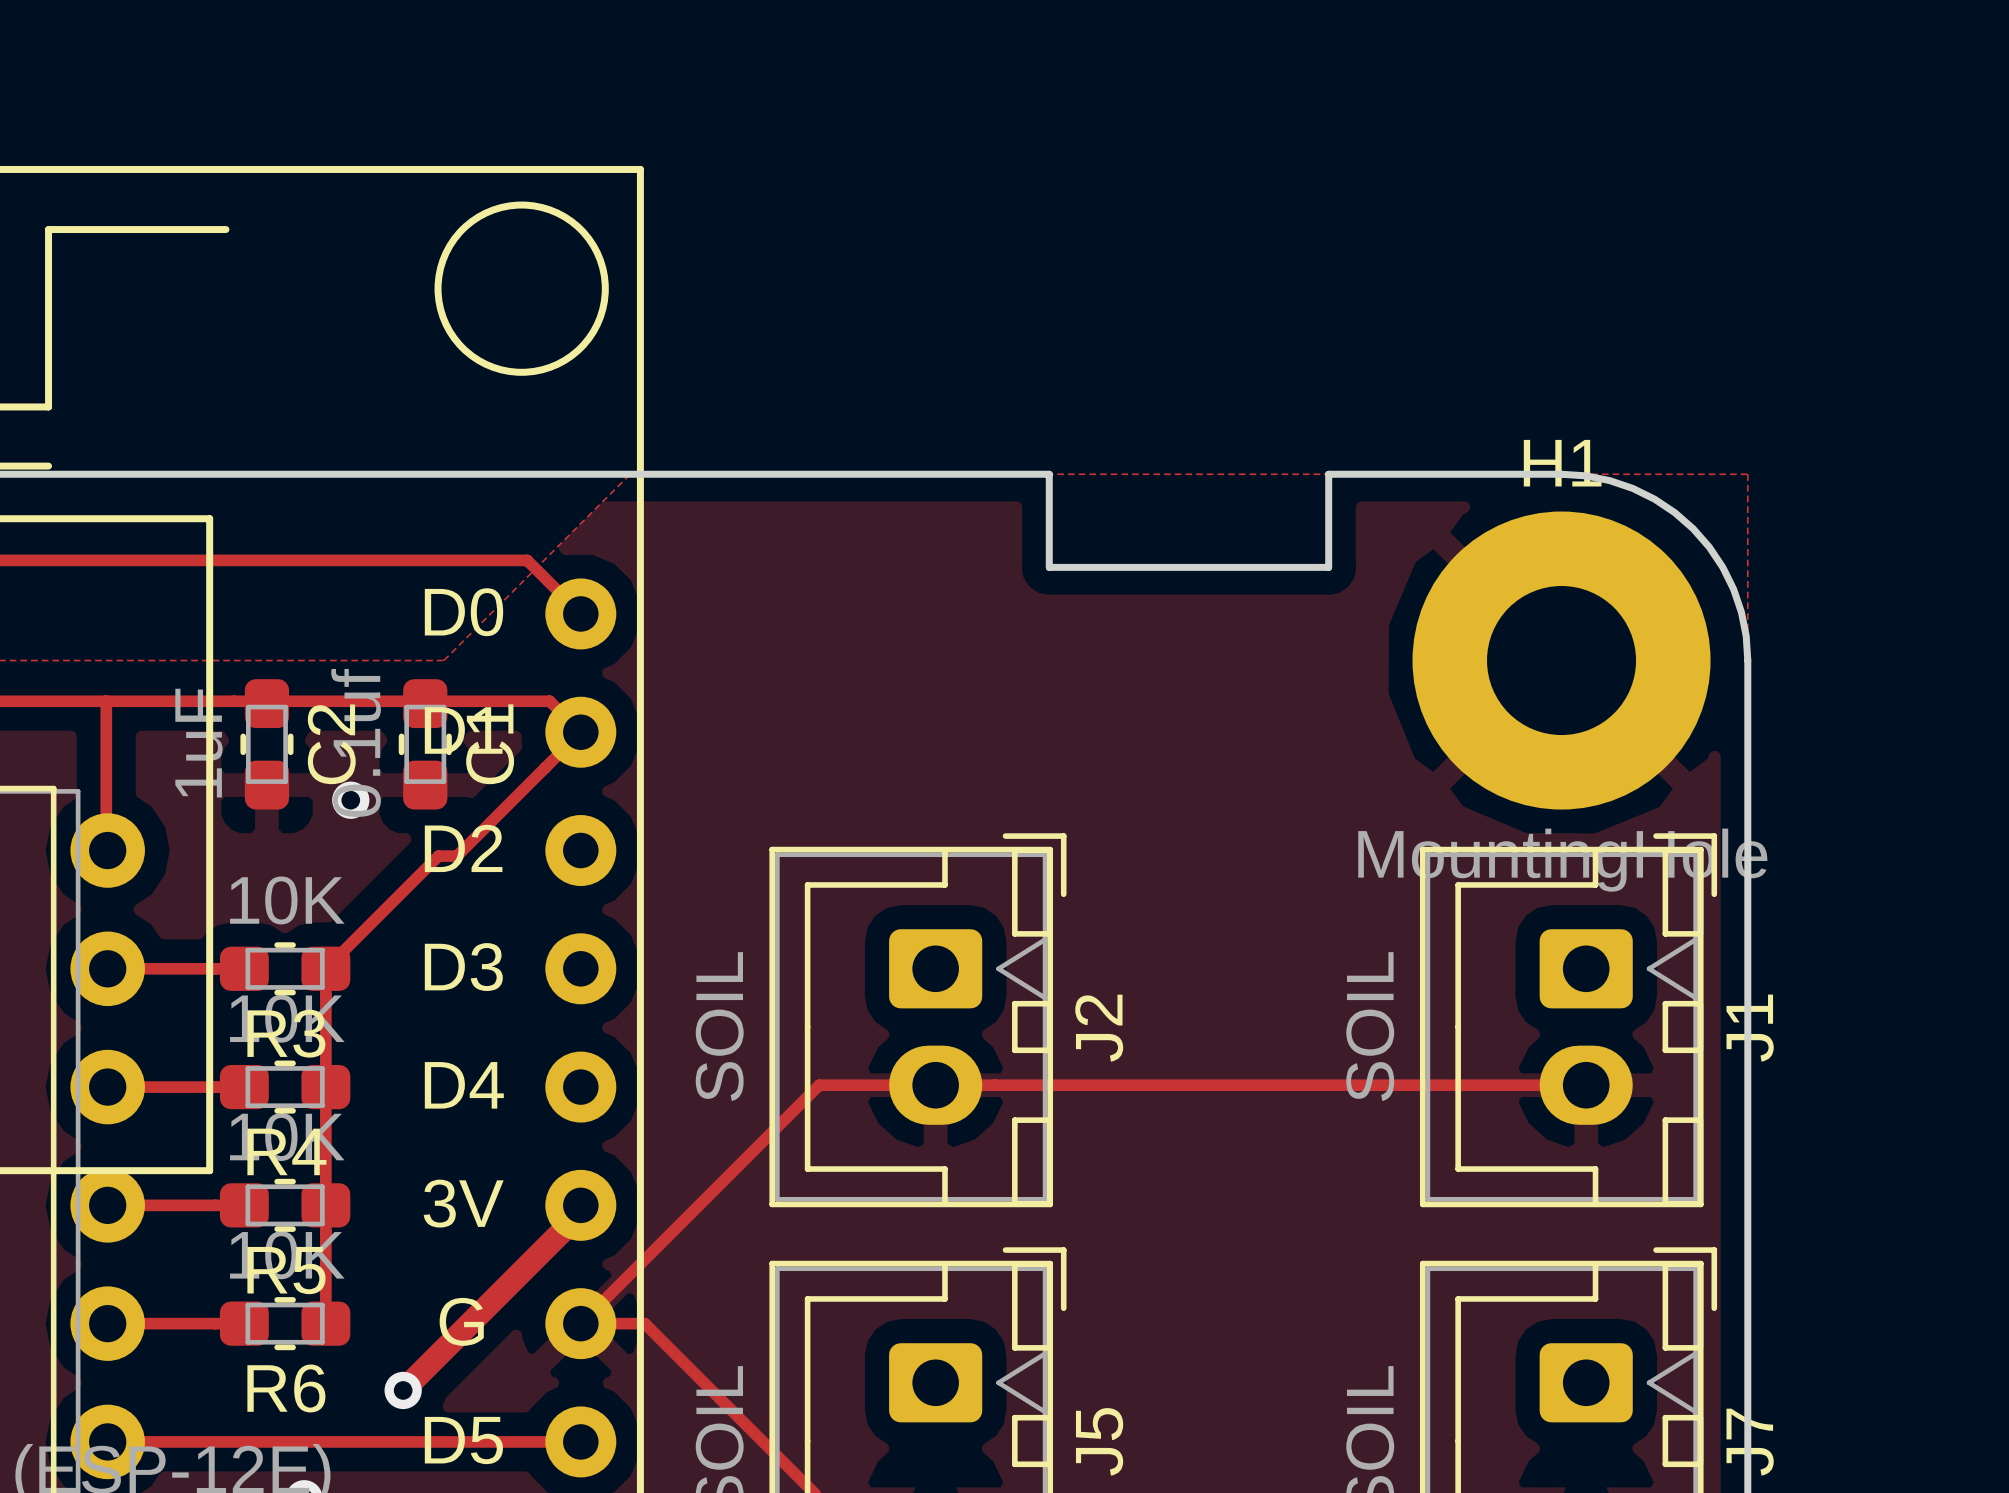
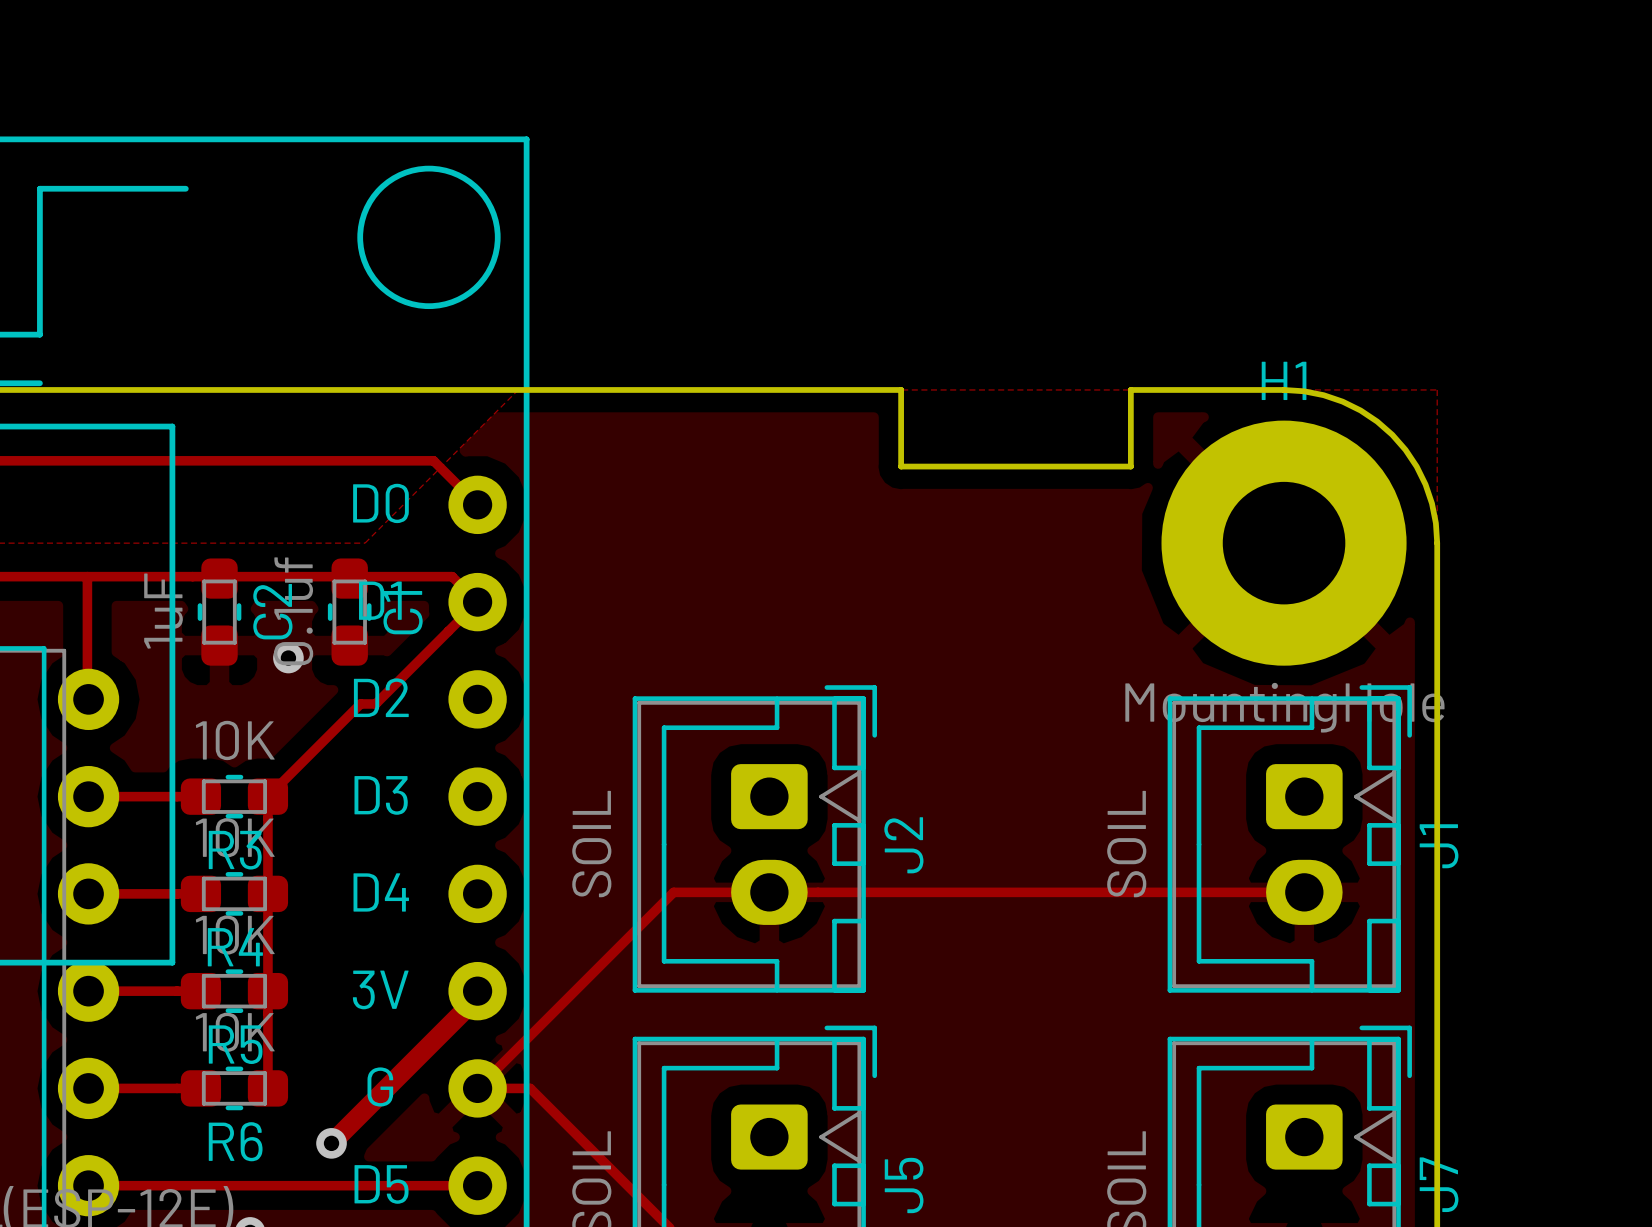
board edge: (1049, 474) (1049, 567) (1095, 567) -> (862, 389) (901, 389) (901, 466)
board edge: (1375, 474) (1328, 474) (1328, 567) -> (1130, 389) (1130, 466) (1092, 466)

